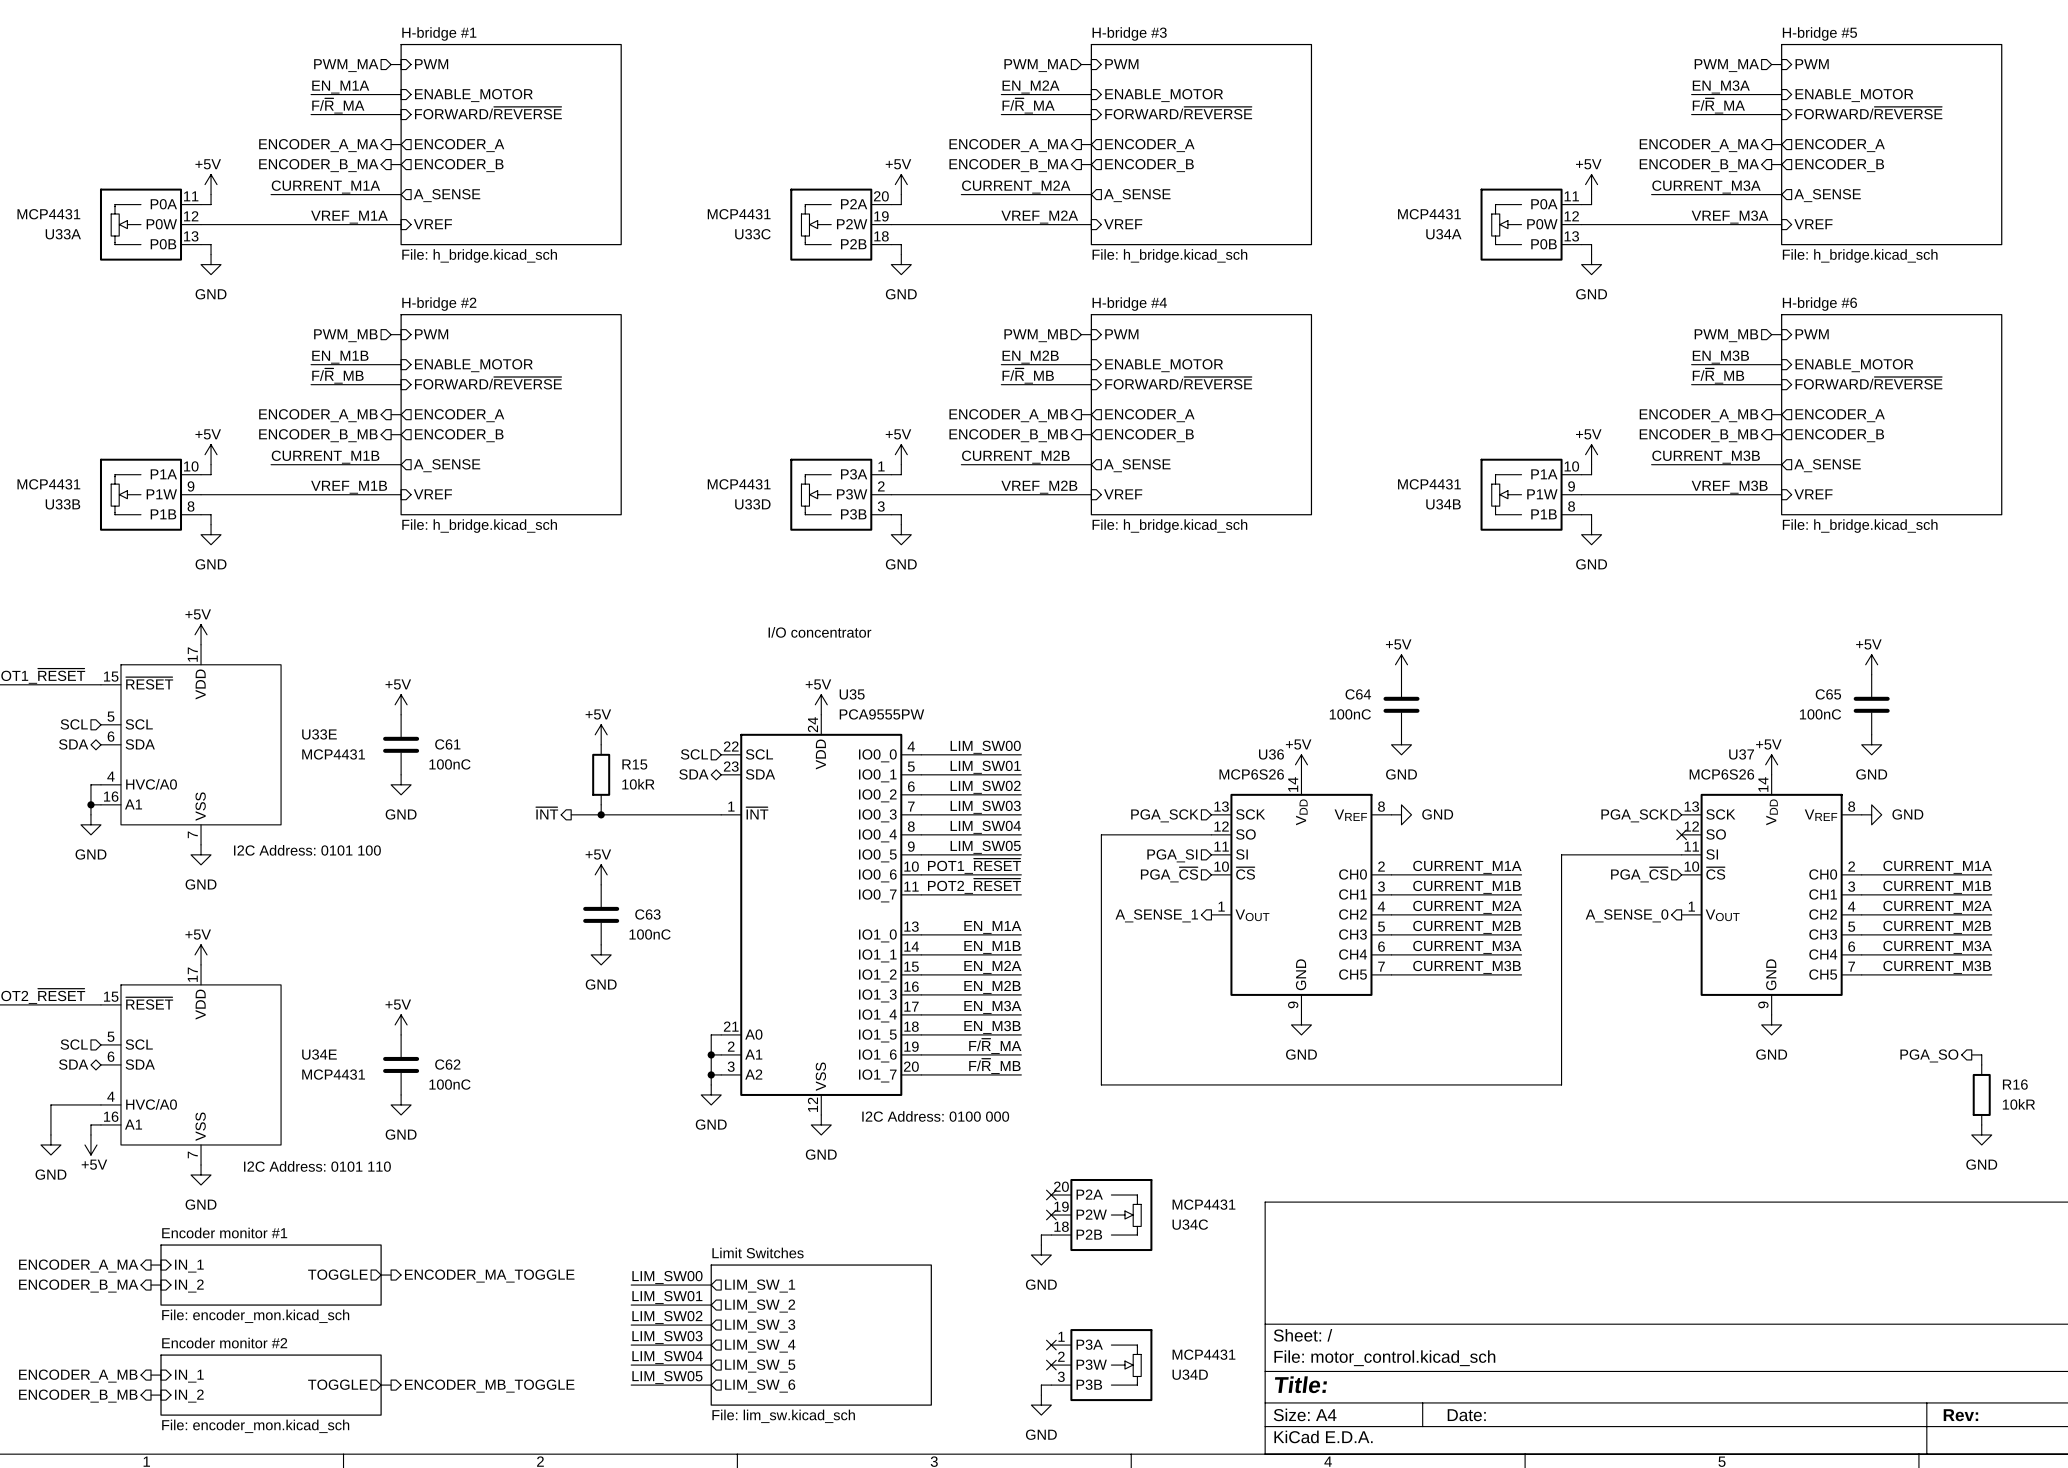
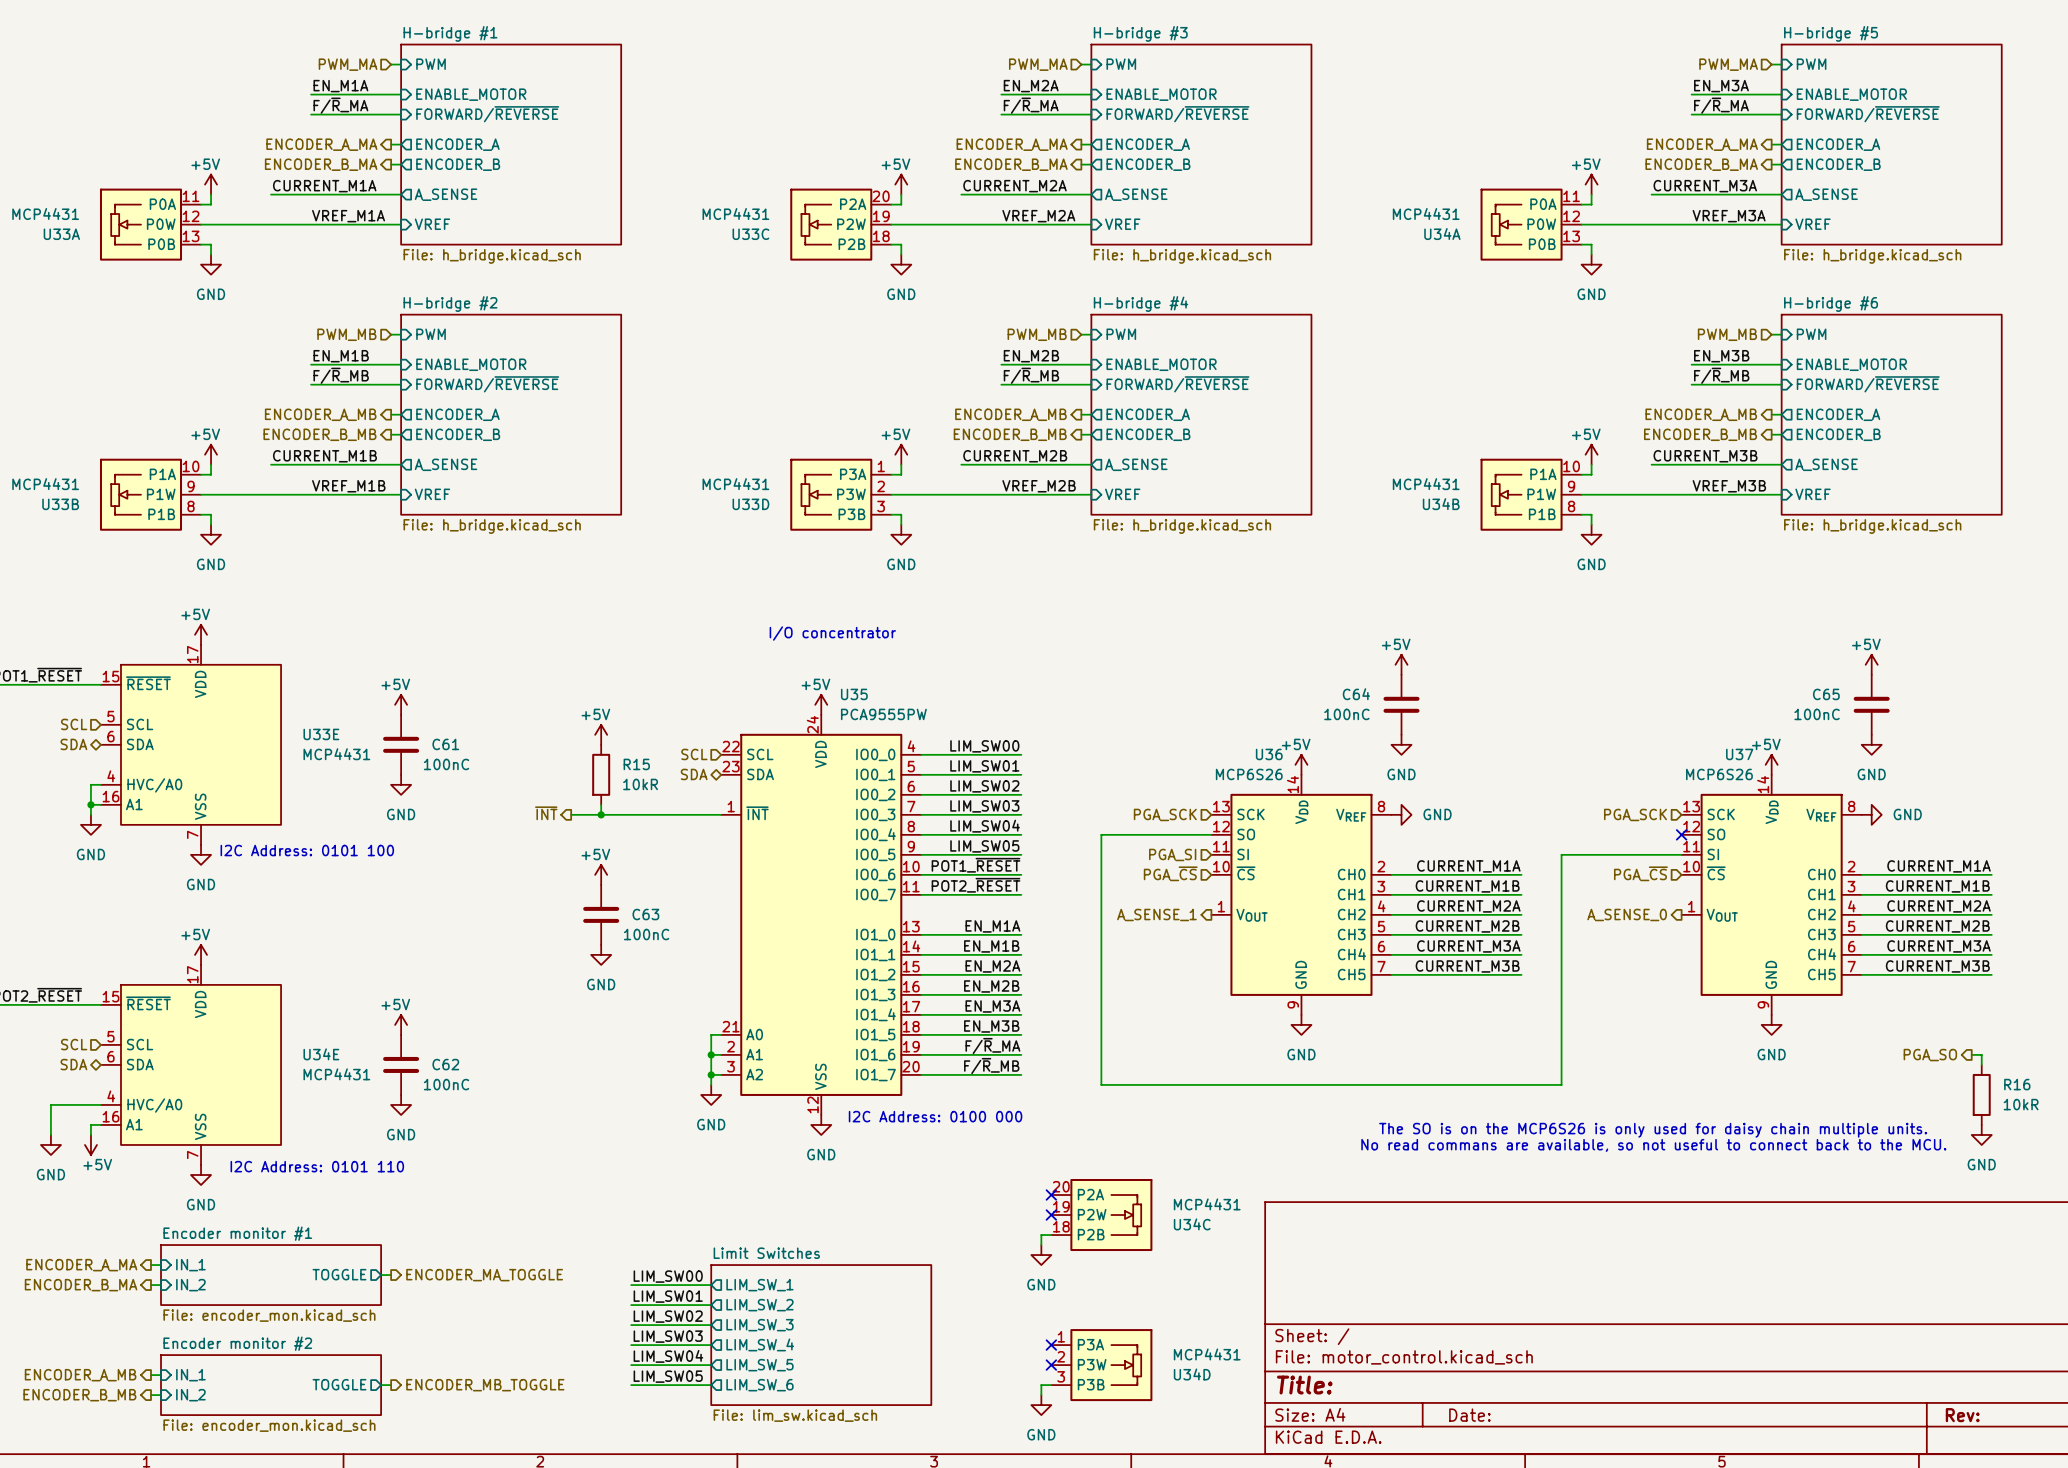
text: none -> The SO is on the MCP6S26 is only used for daisy chain multiple units. (1653, 1130)
text: none -> No read commans are available, so not useful to connect back to the MCU. (1653, 1145)

